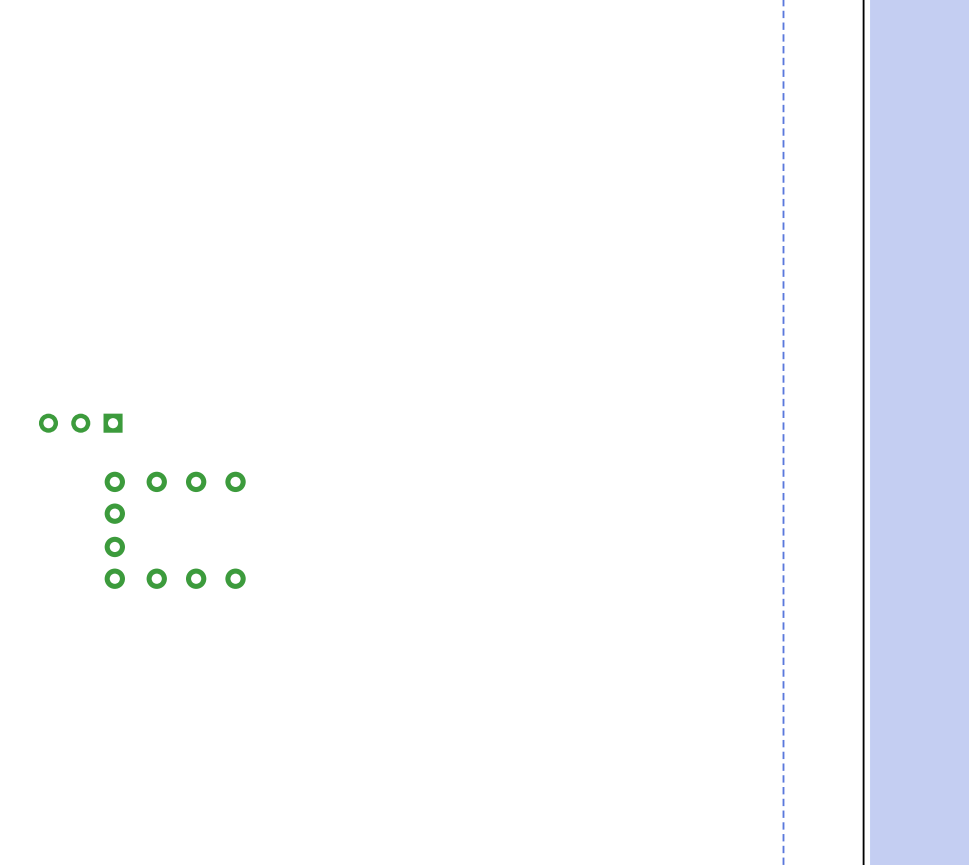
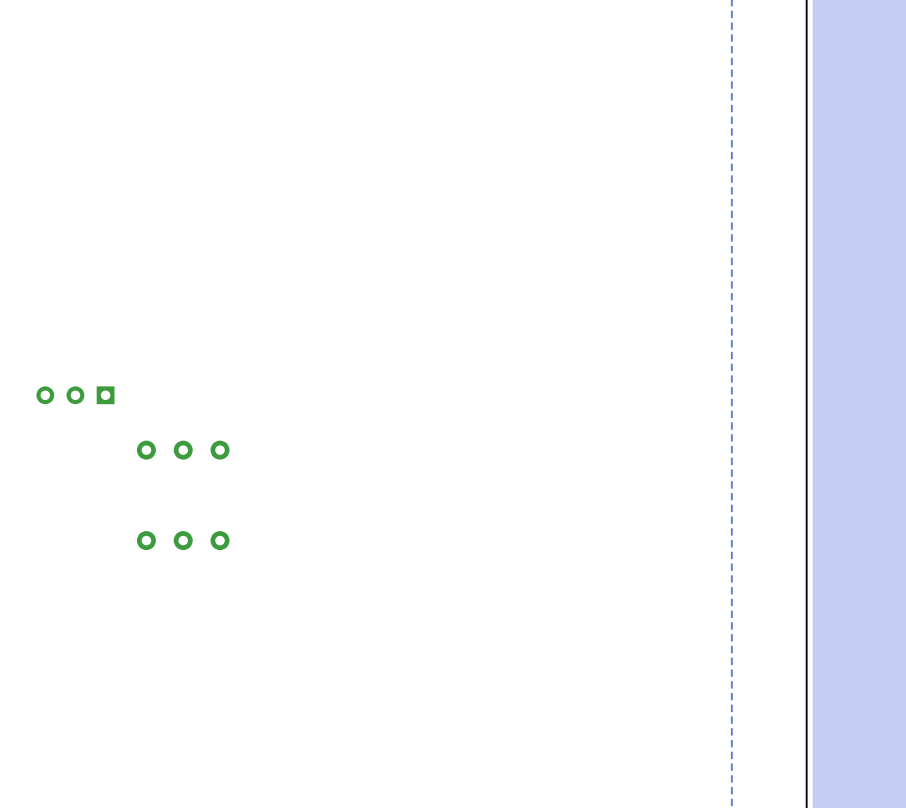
part: (114, 497) -> none
part: (114, 562) -> none

